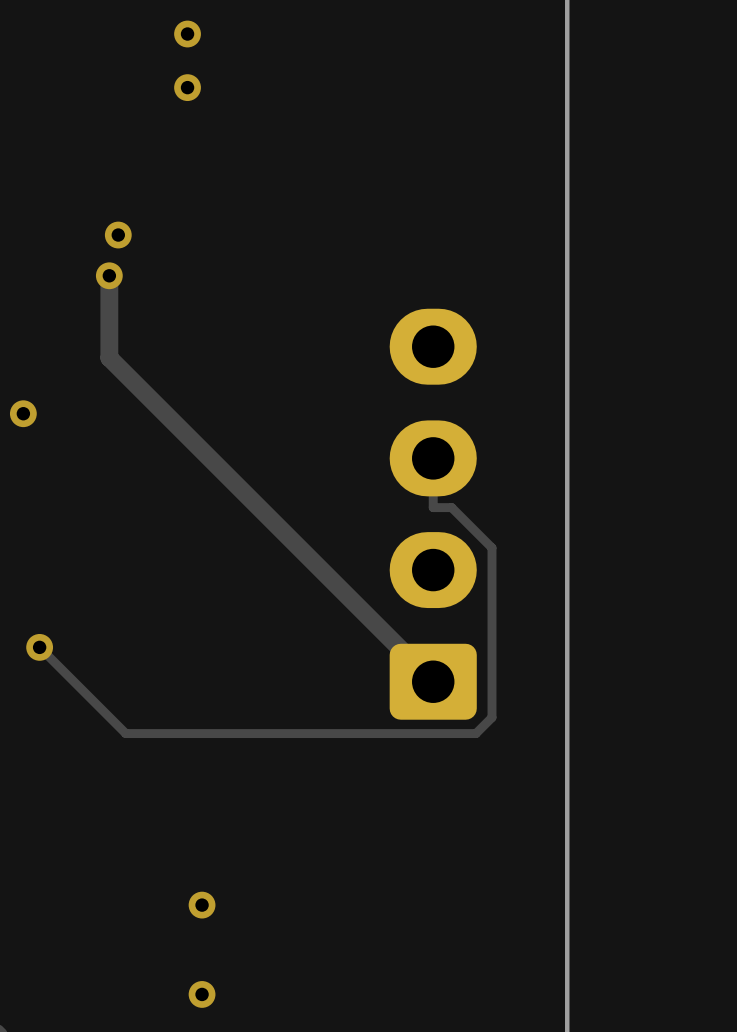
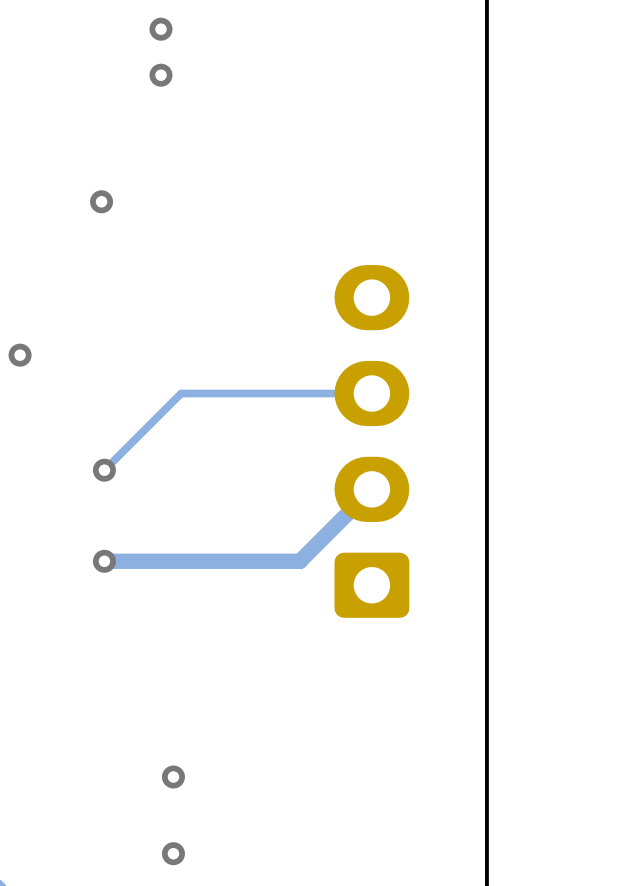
track: (109, 275) (109, 357) (433, 681) -> none
via: (109, 275) -> none
track: (433, 458) (433, 507) (451, 507) (491, 547) (491, 717) (476, 733) (125, 733) (39, 647) -> (371, 393) (181, 393) (104, 470)
via: none -> (104, 470)
track: none -> (371, 489) (300, 561) (104, 561)
via: (39, 647) -> none
via: none -> (104, 561)

